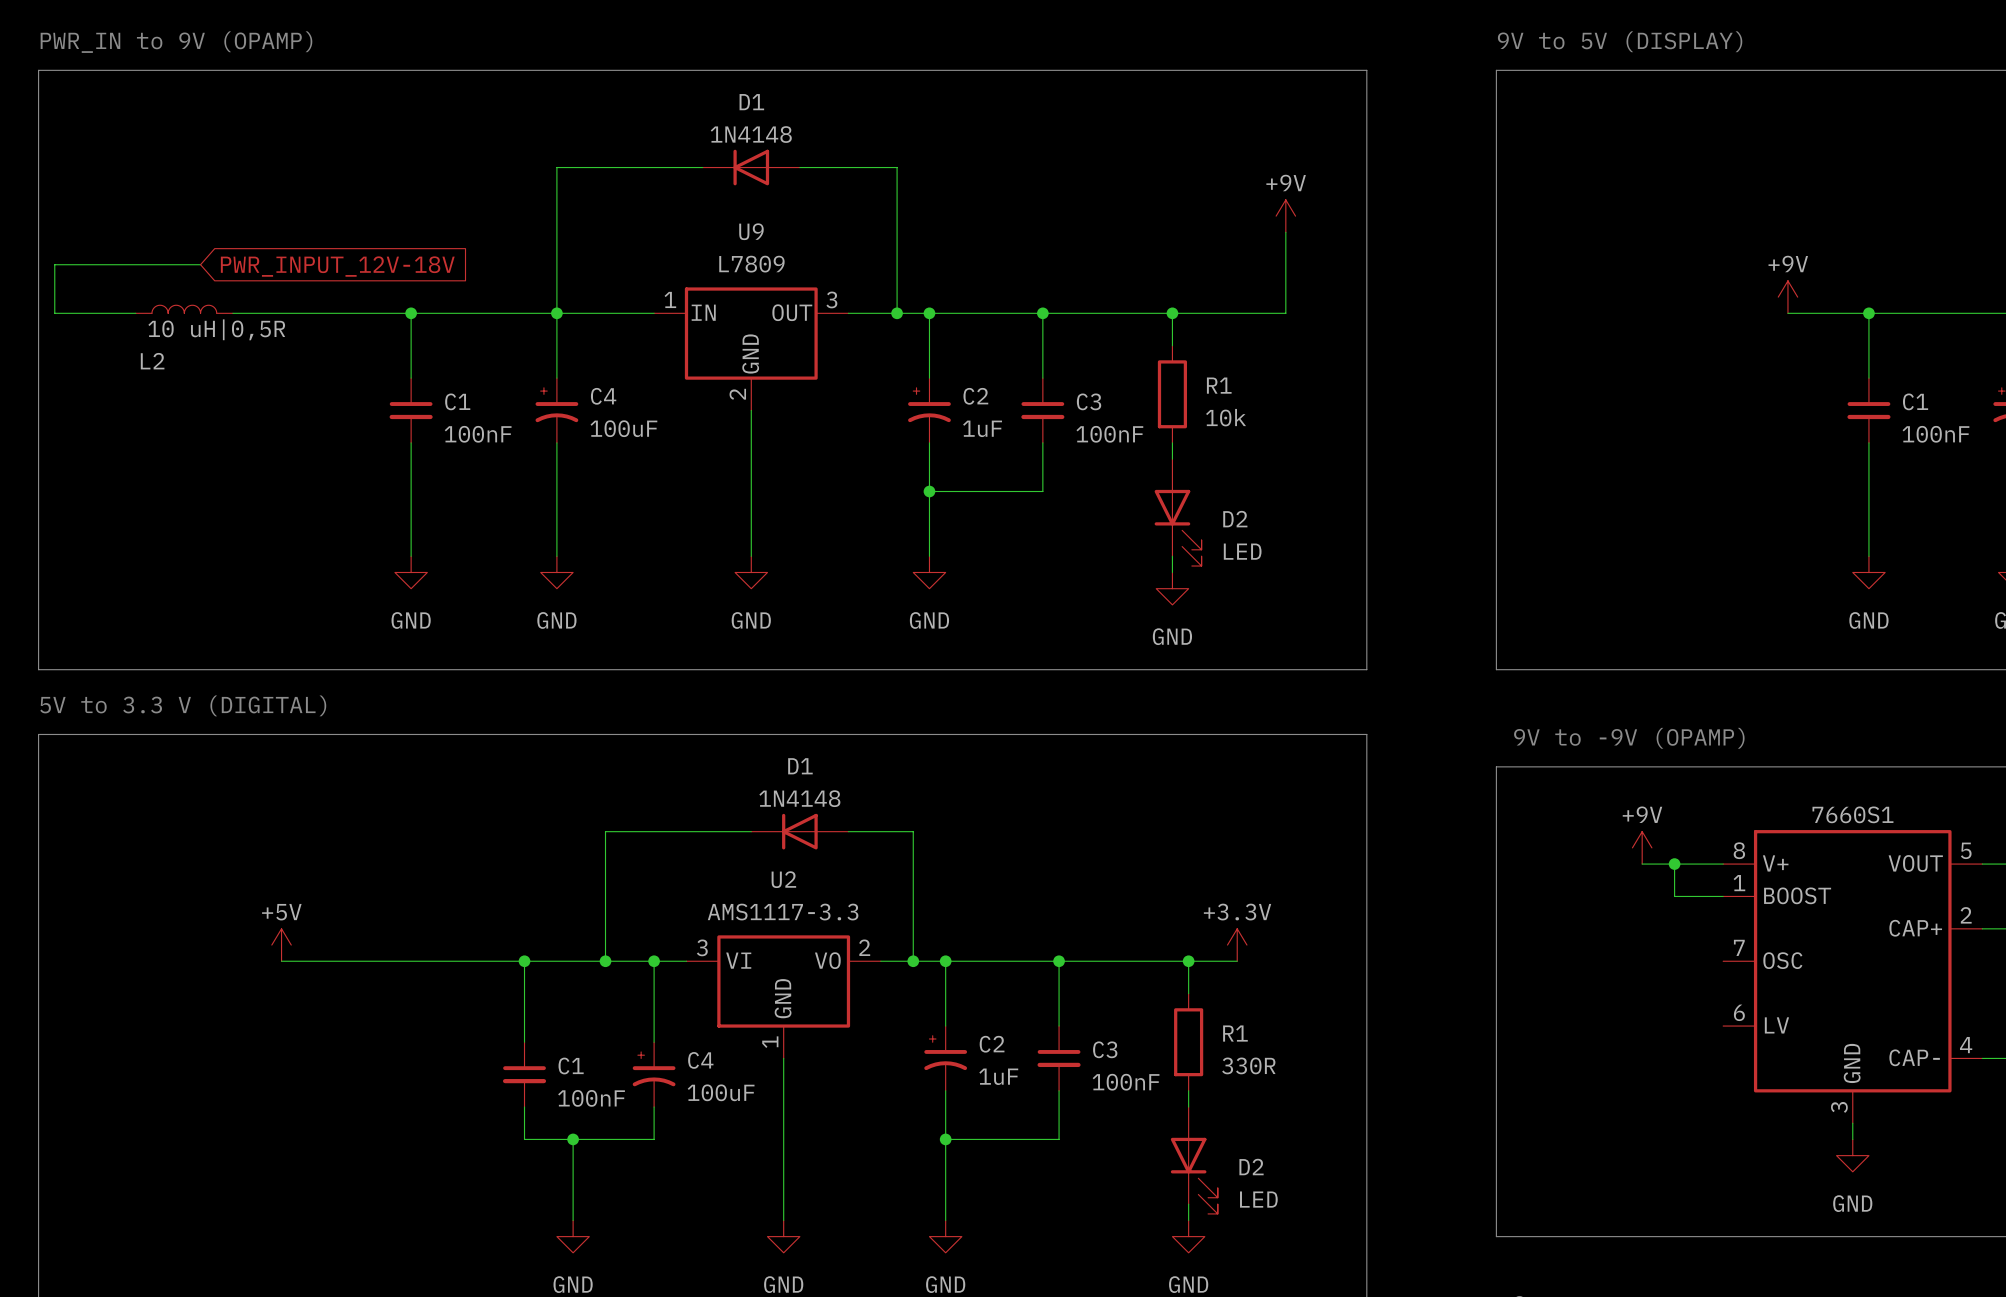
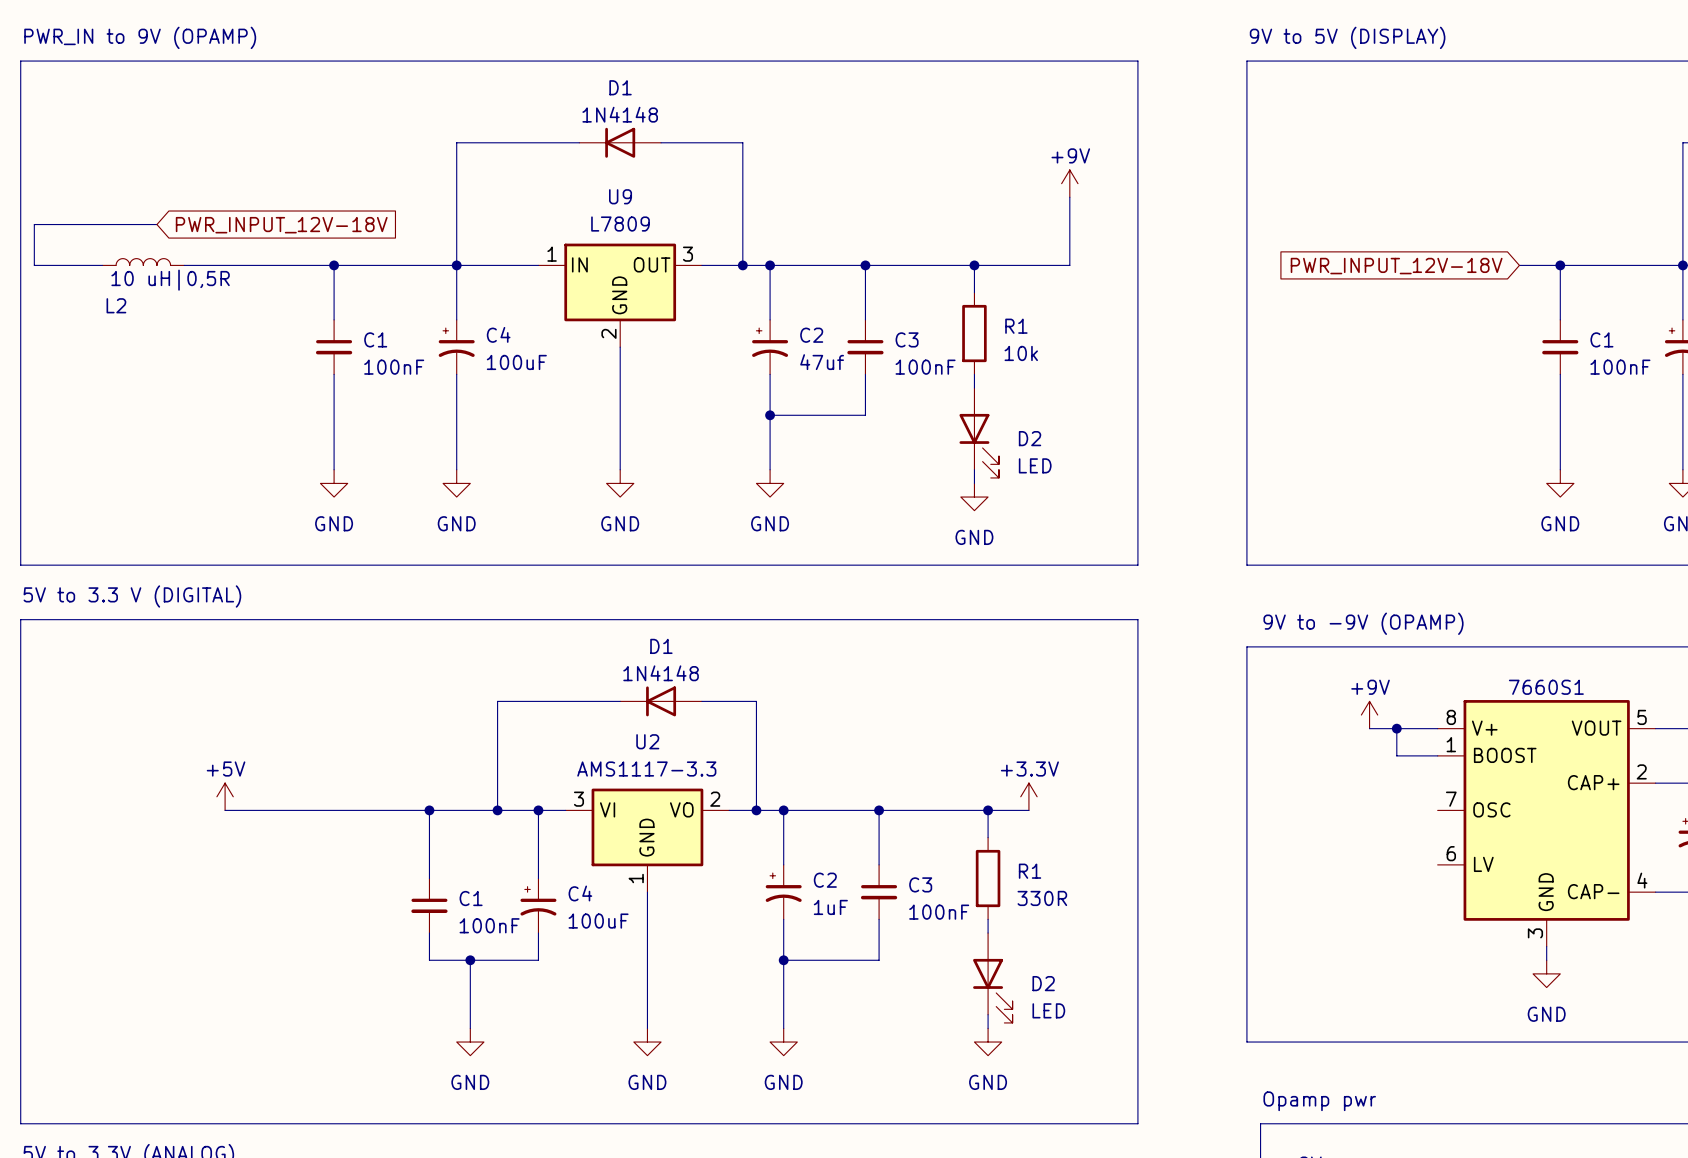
power symbol: +9V (1787, 297) -> none
wire: (1787, 313) (1820, 313) -> none
global label: none -> PWR_INPUT_12V-18V (1396, 266)
C2 value: 1uF (982, 428) -> 47uf (822, 362)

